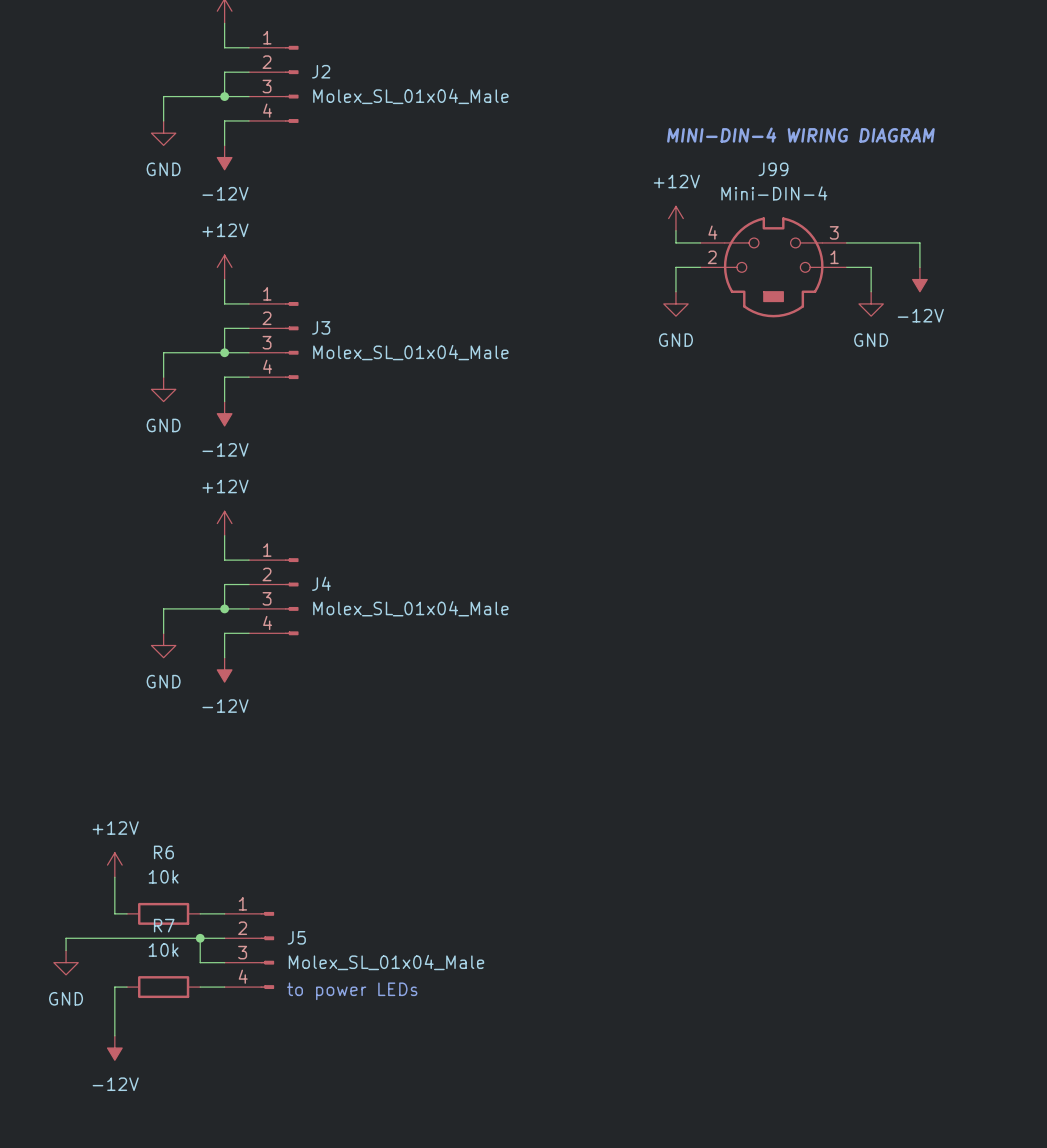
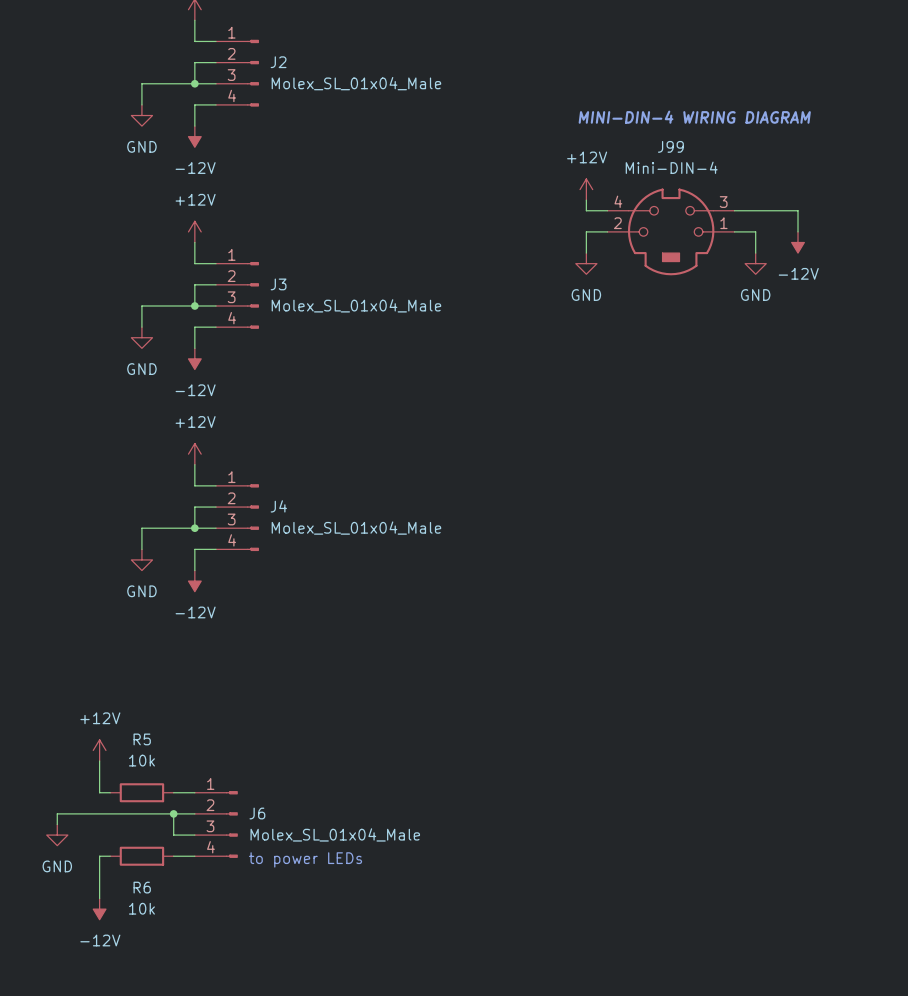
R6 name: R6 (163, 852) -> R5 (142, 739)
R7 name: R7 (164, 925) -> R6 (142, 887)
J5 name: J5 (296, 937) -> J6 (257, 813)
R7 value position: 10k (163, 950) -> 10k (141, 908)

